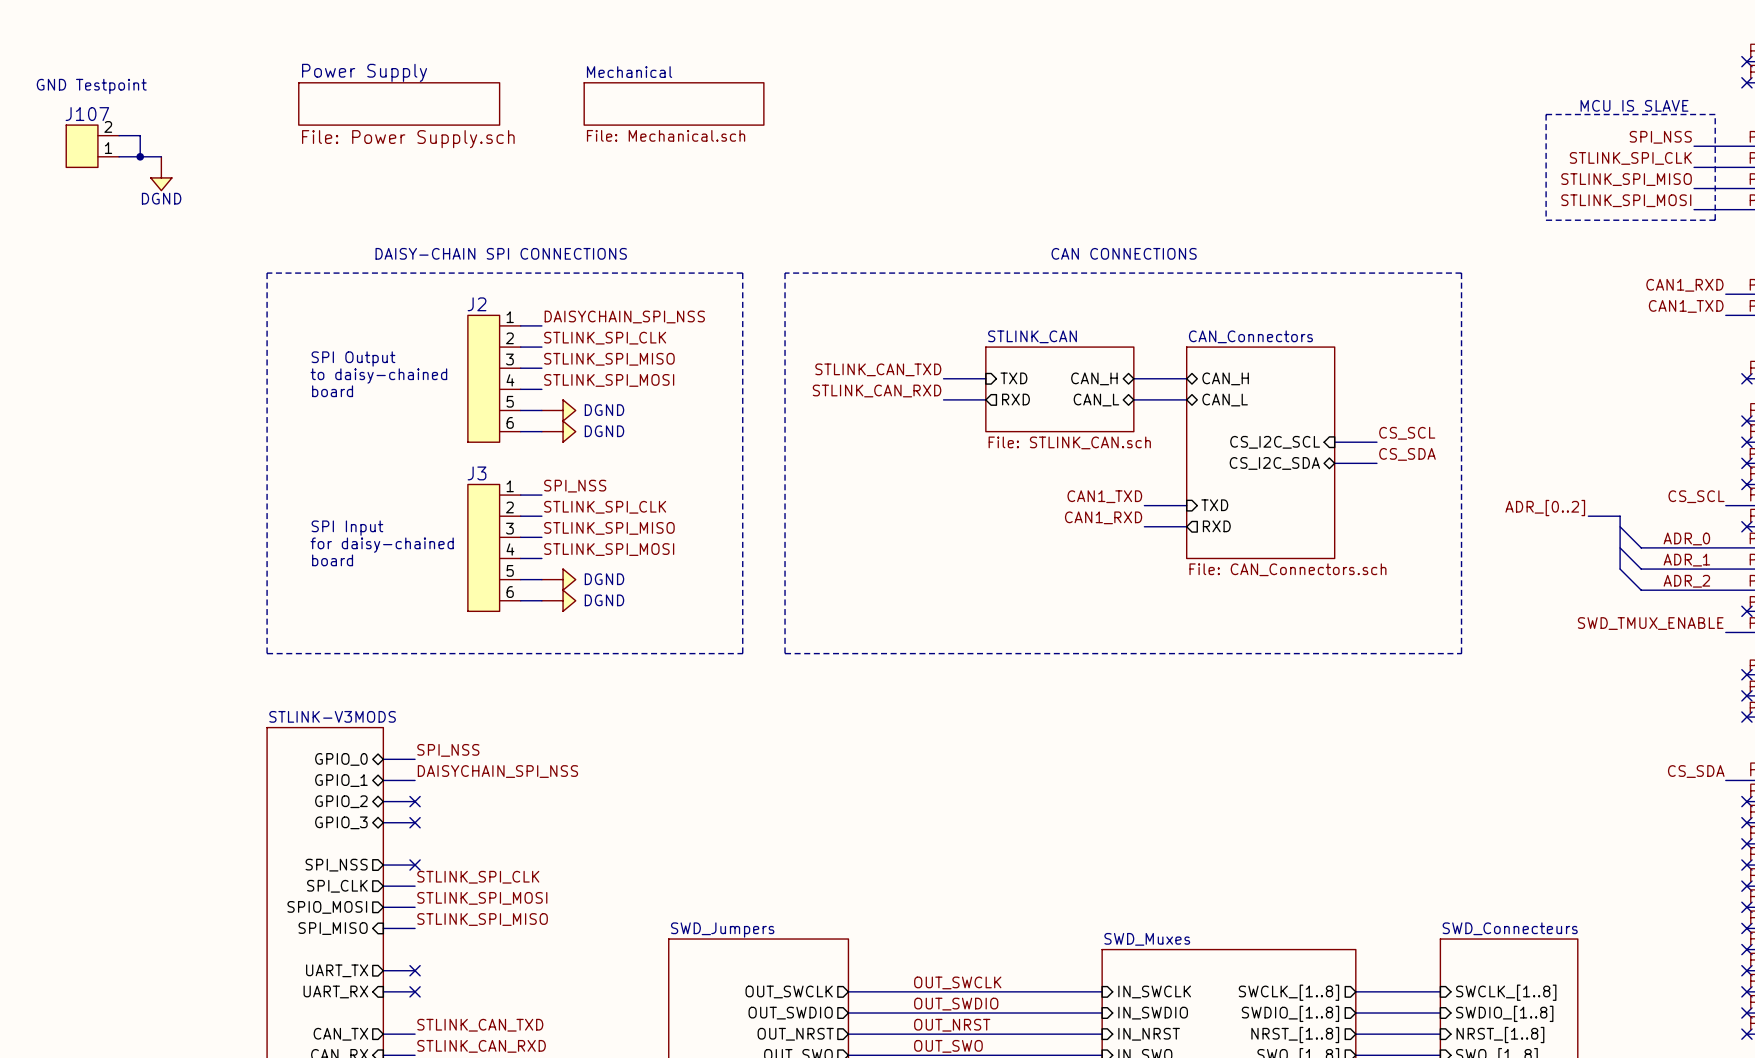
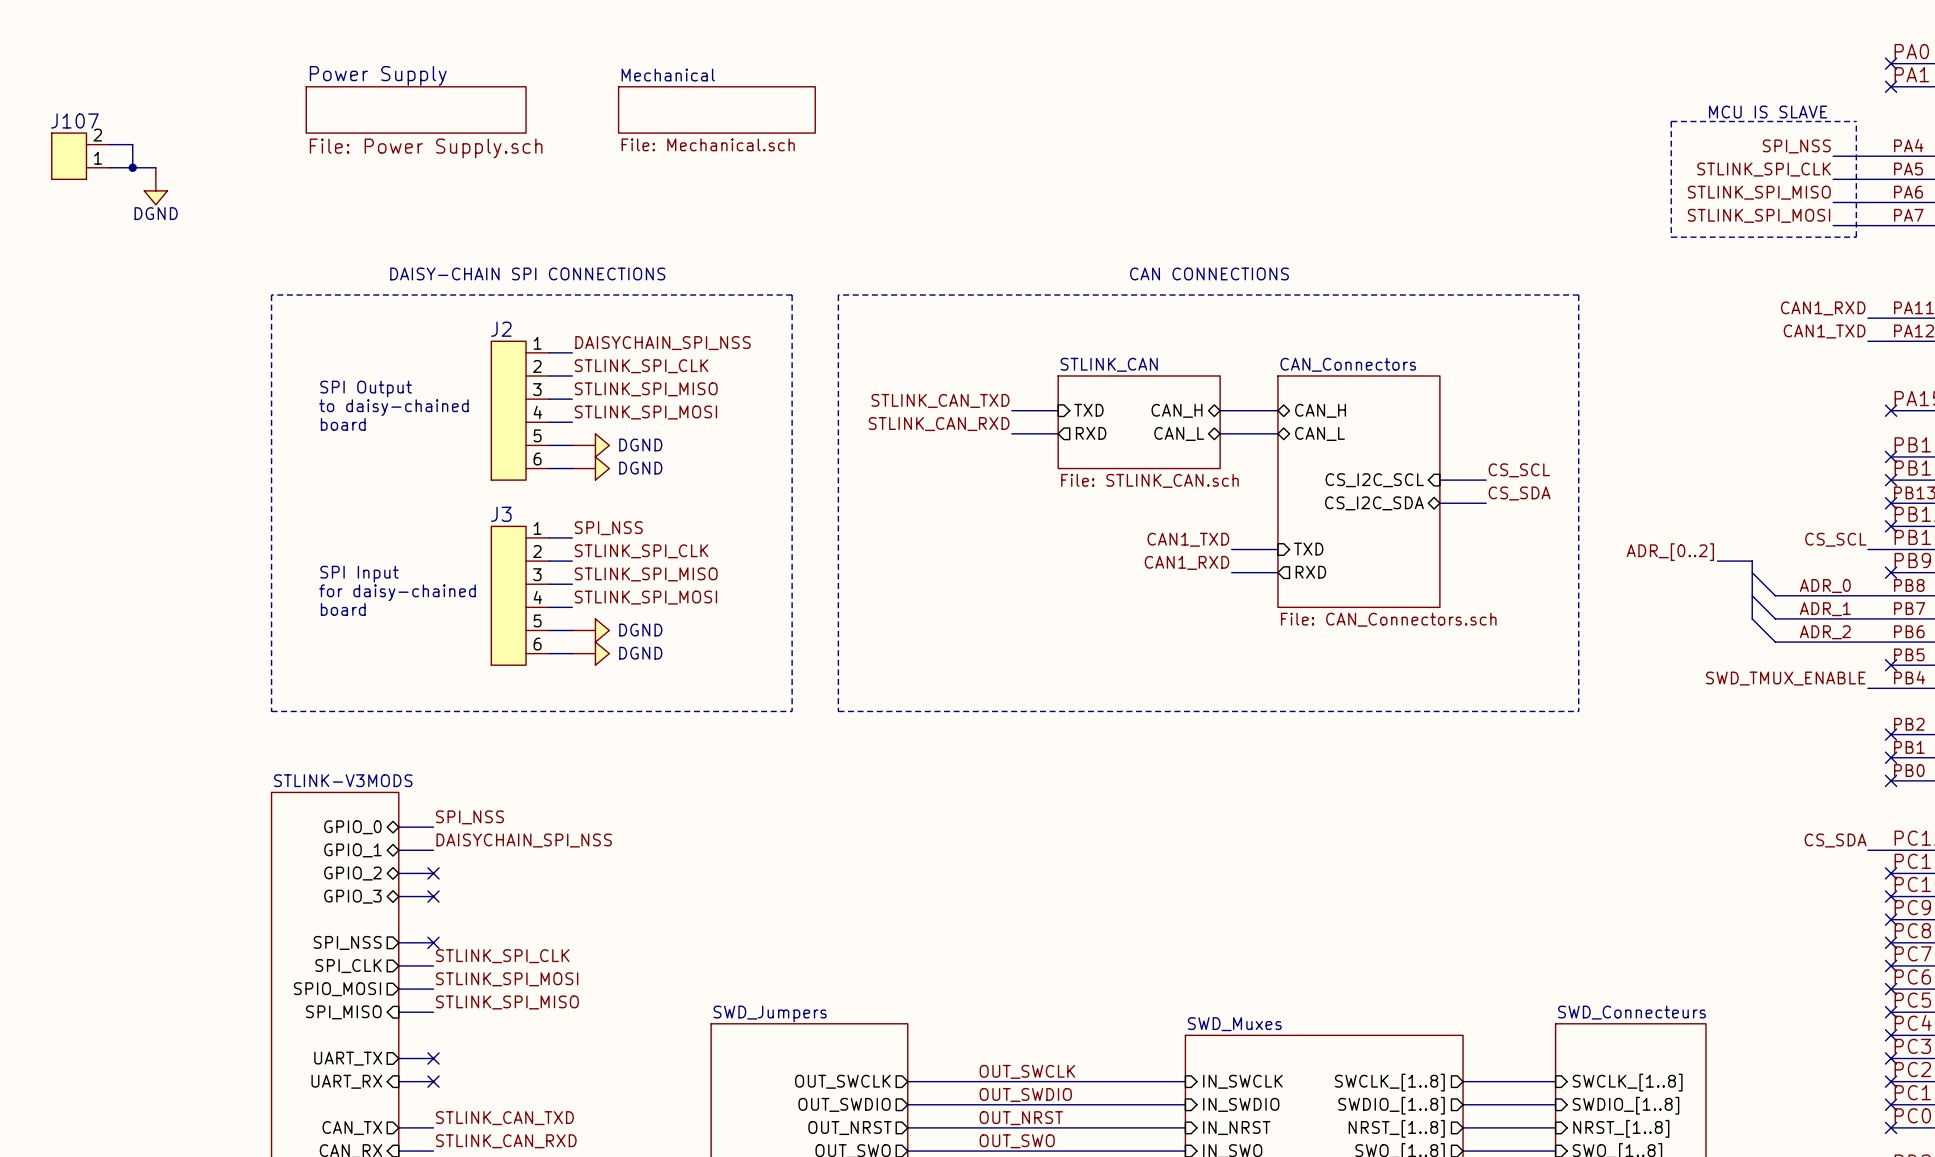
text: GND Testpoint (91, 86) -> none

